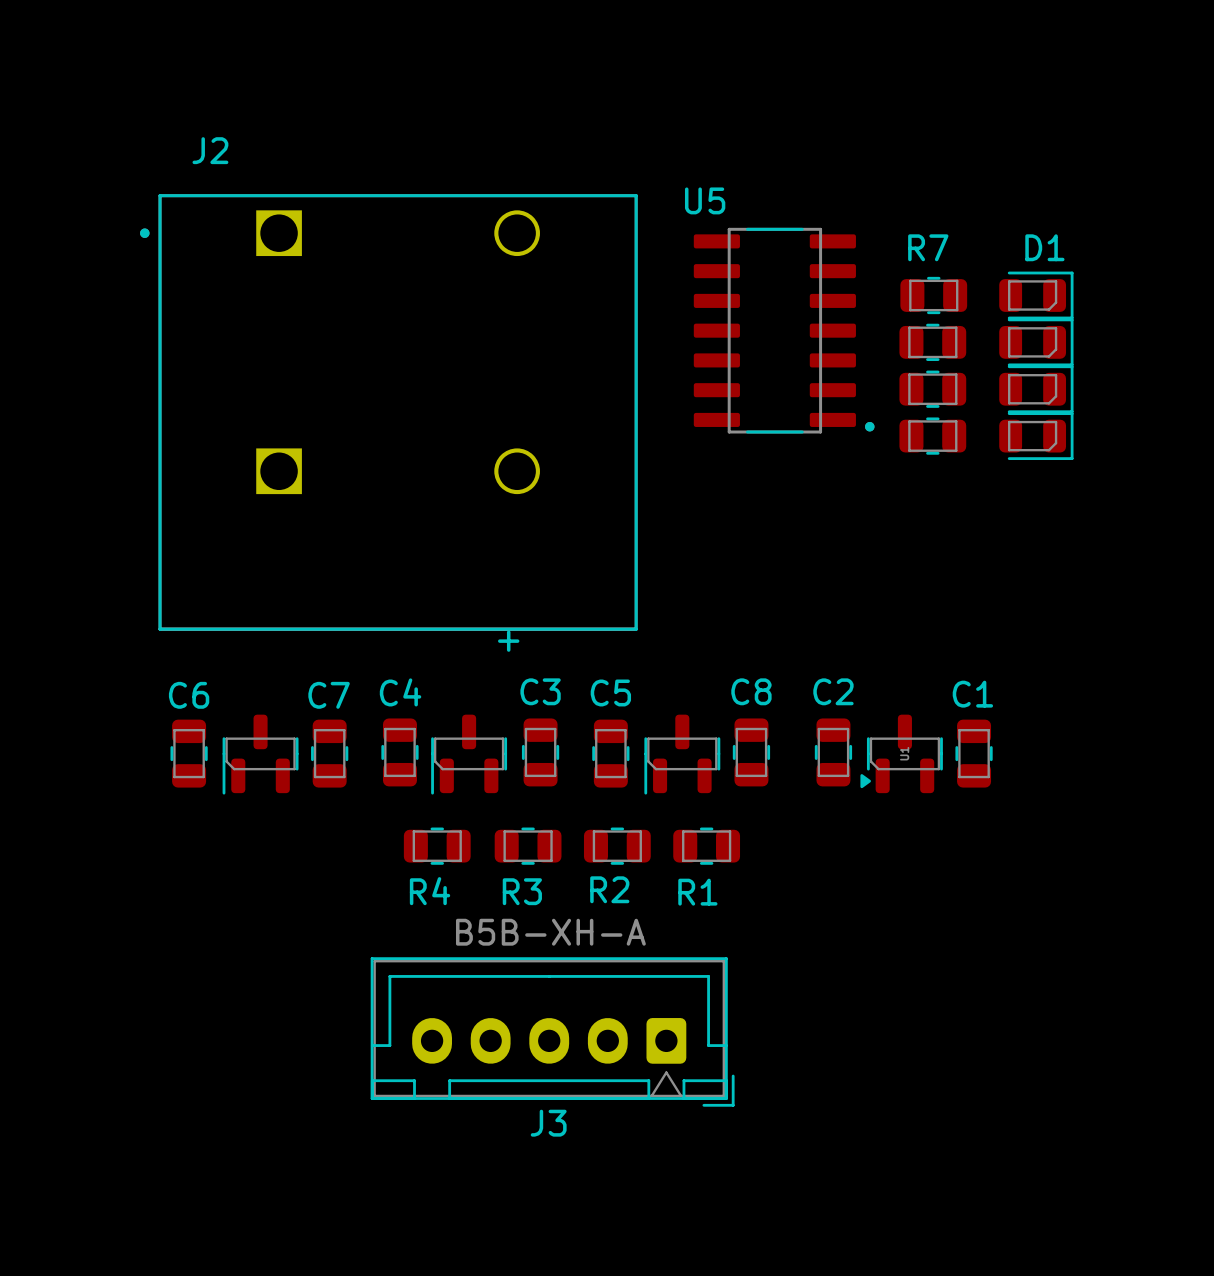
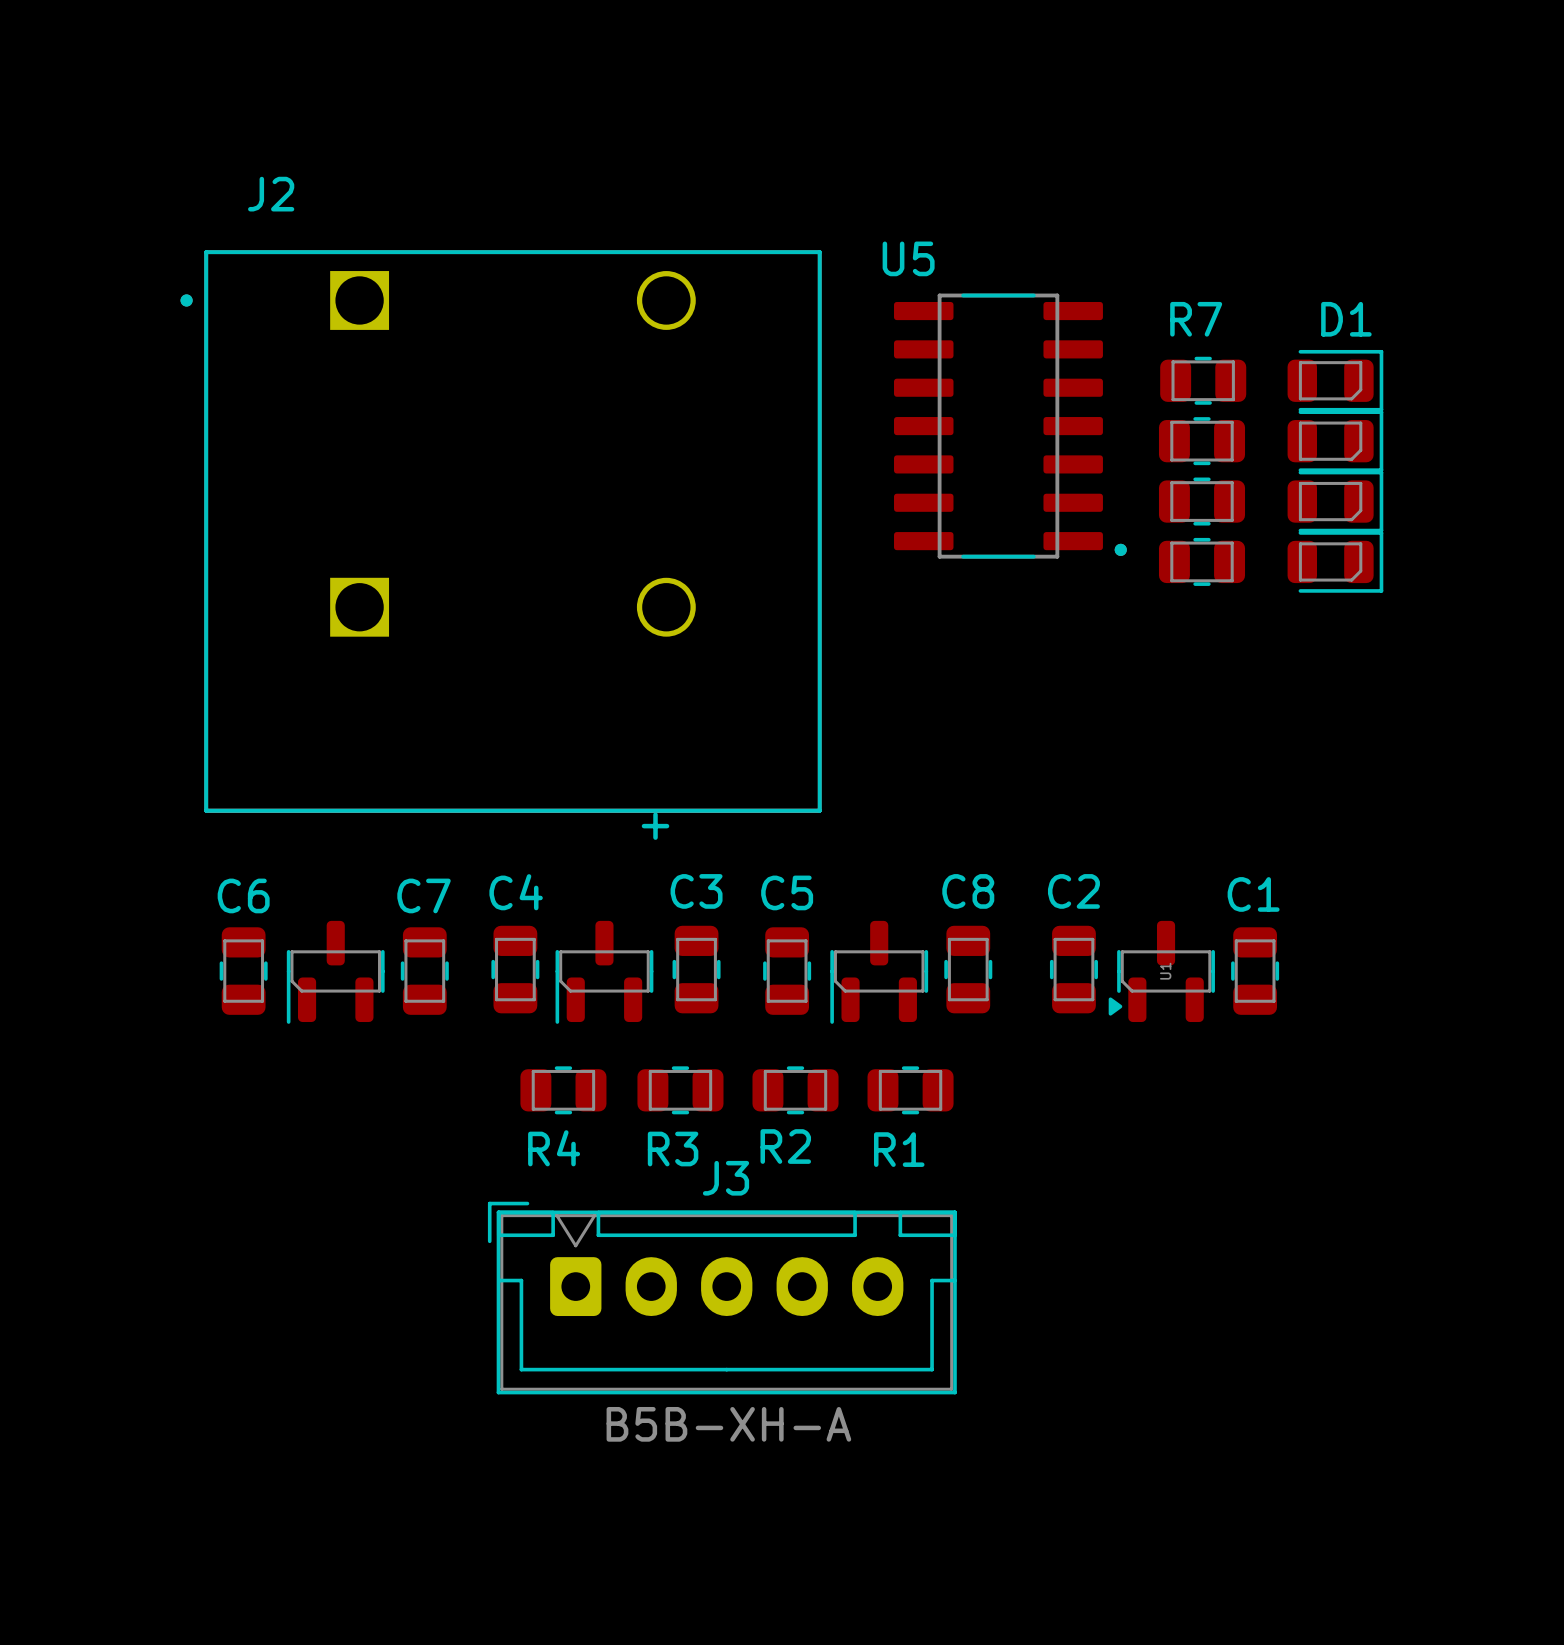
J3 rotation: 0° (552, 1031) -> 180° (722, 1298)

